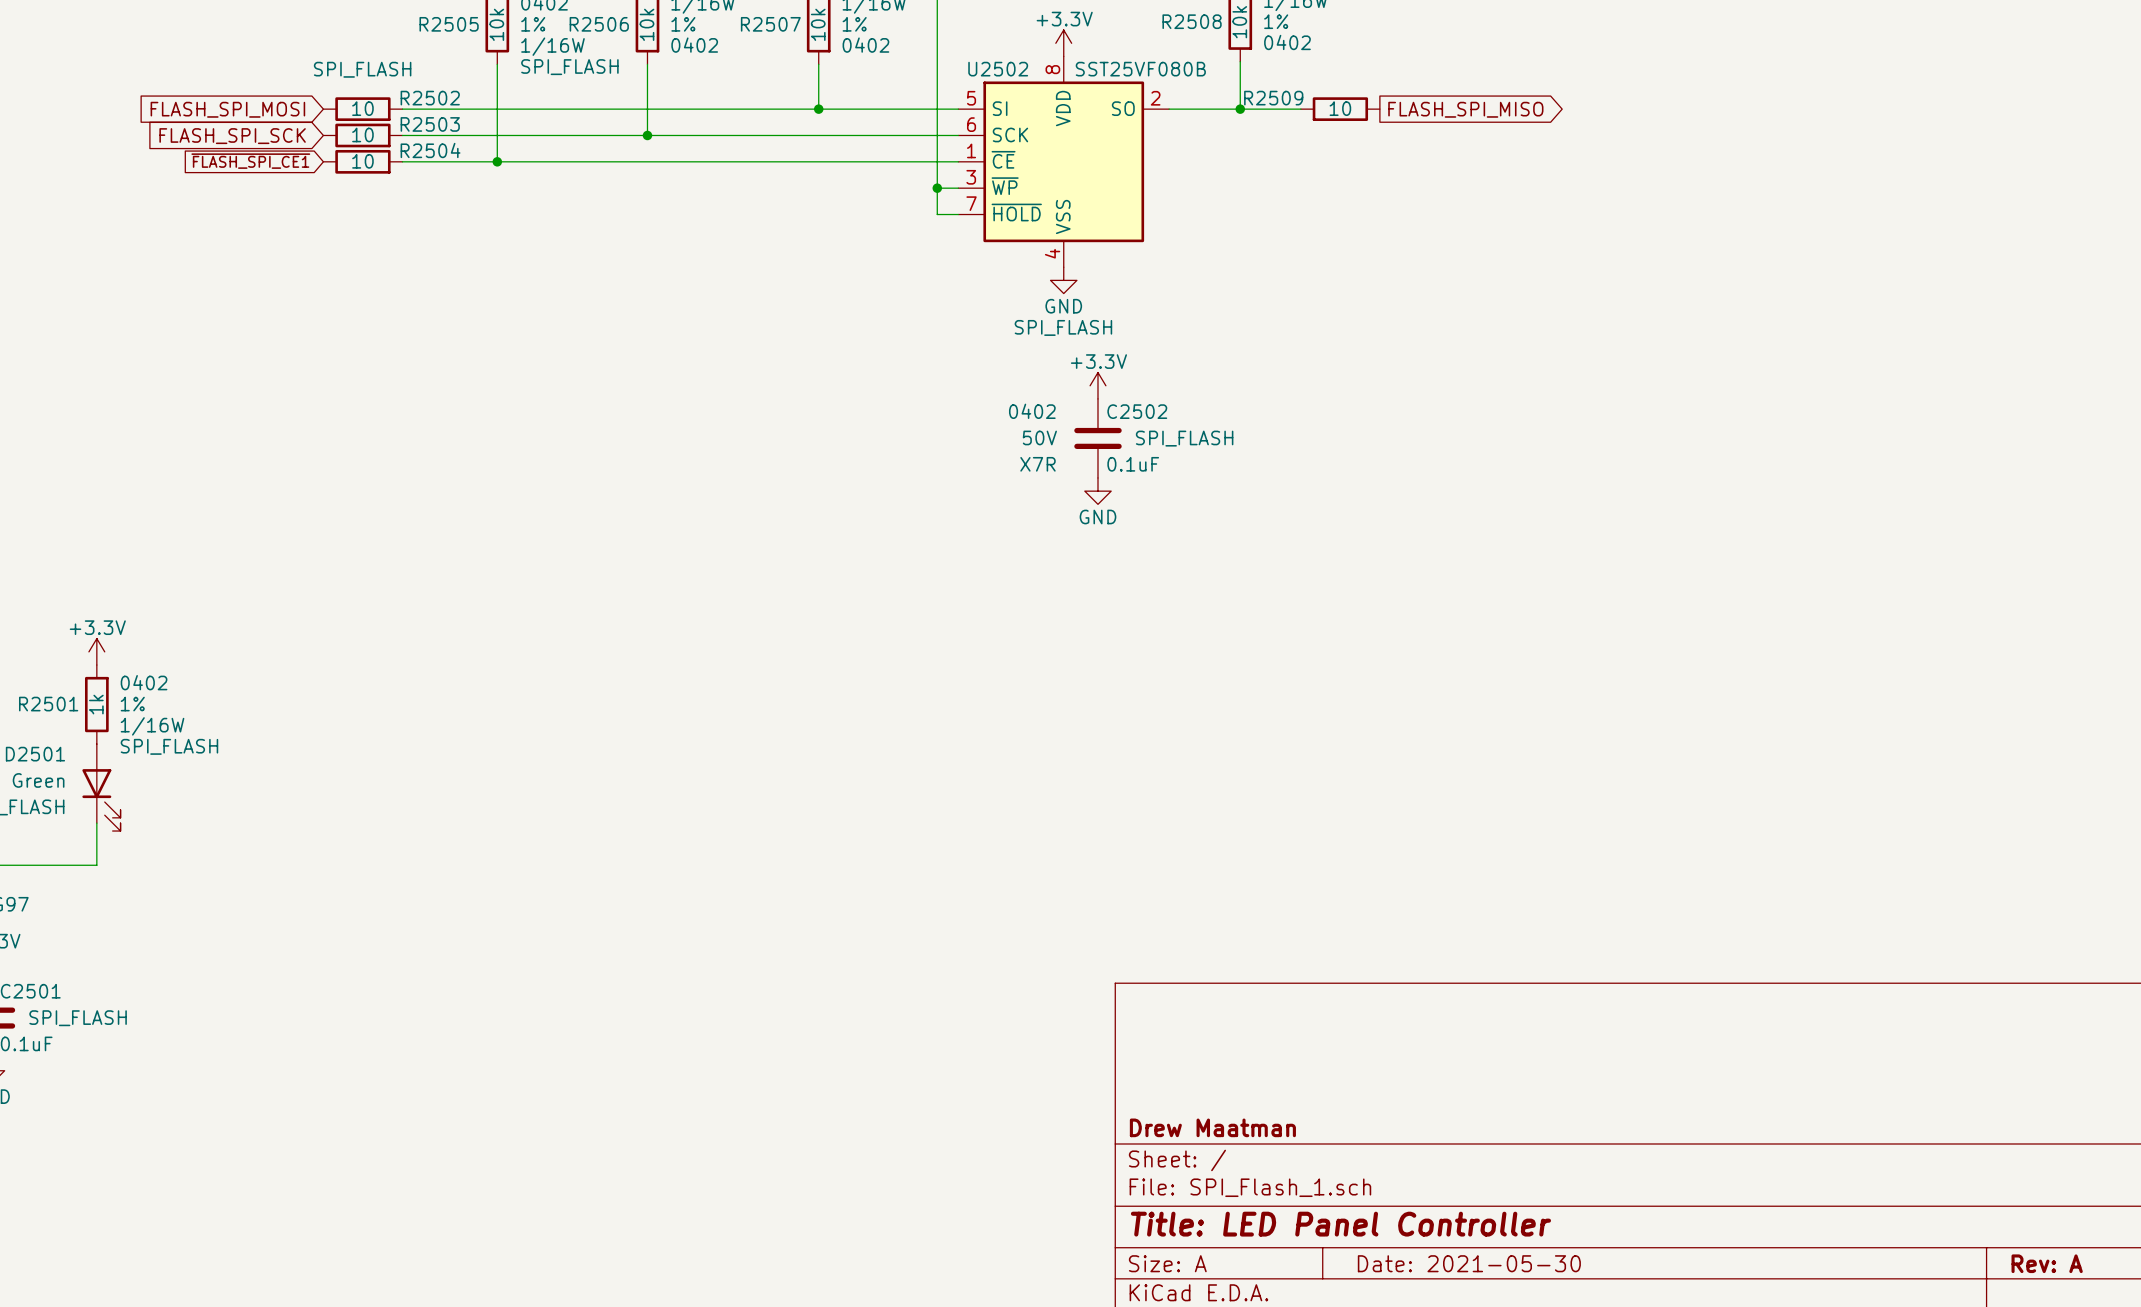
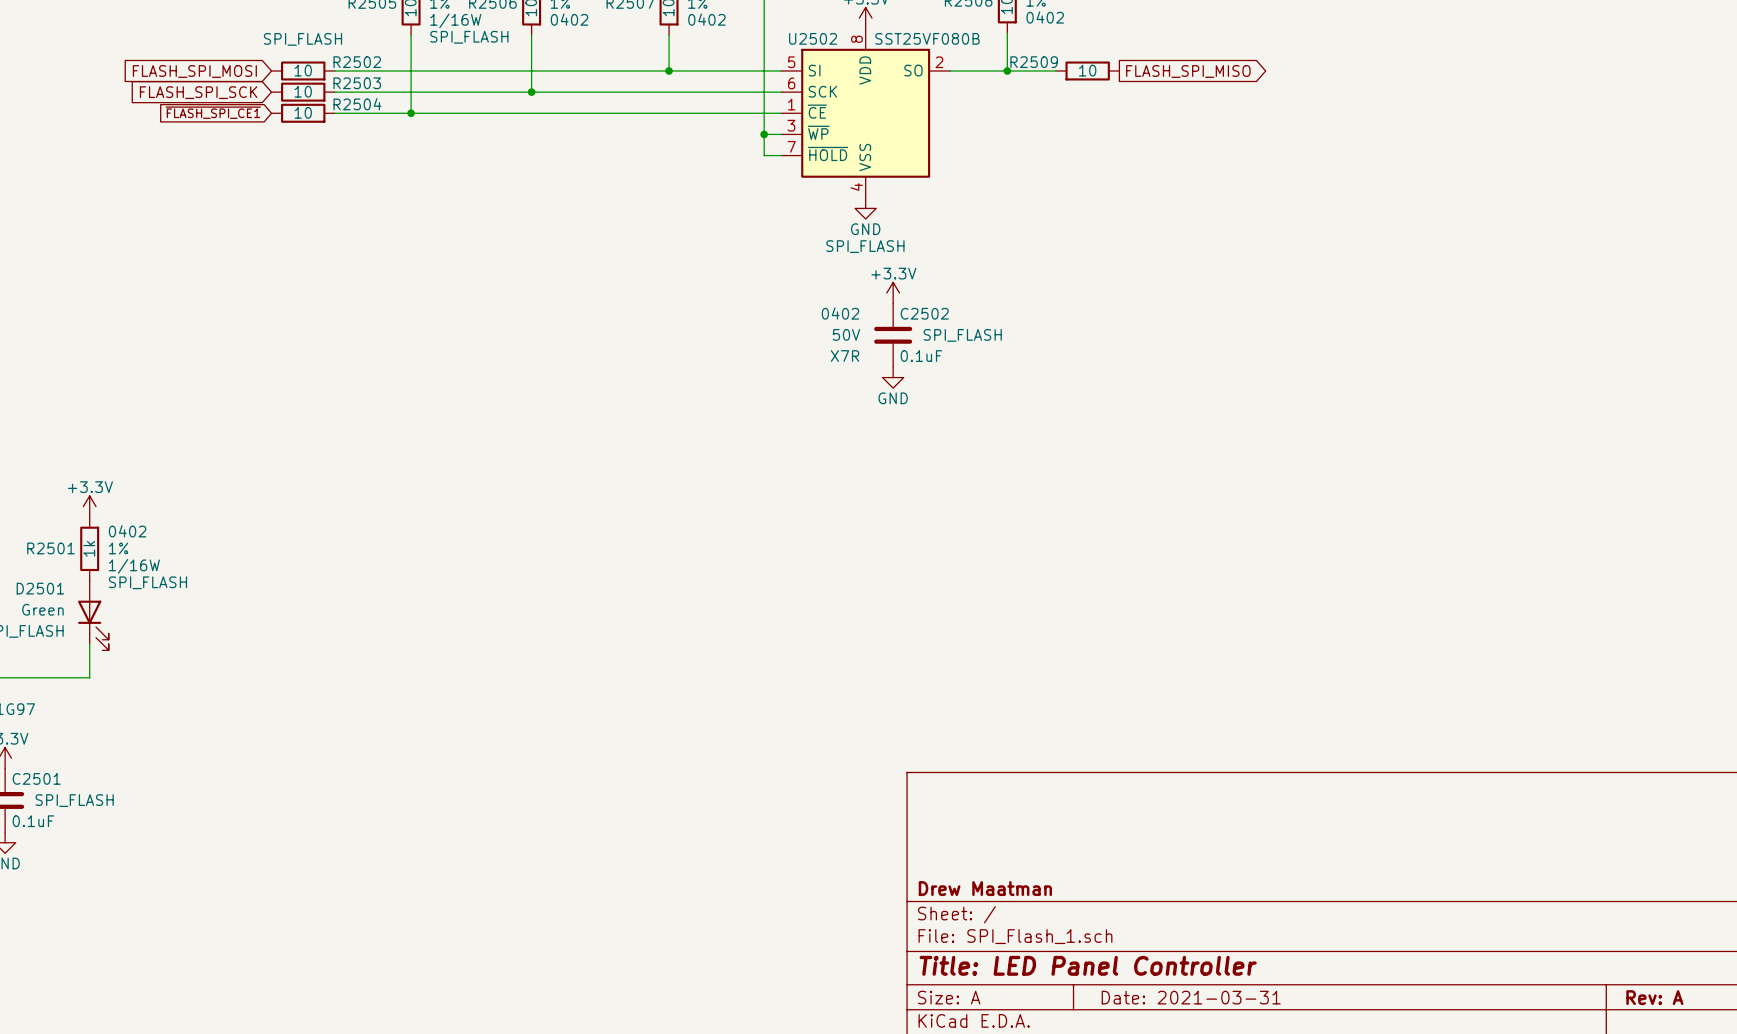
title block: Date: 2021-05-30 (1469, 1263) -> Date: 2021-03-31 (1191, 997)

